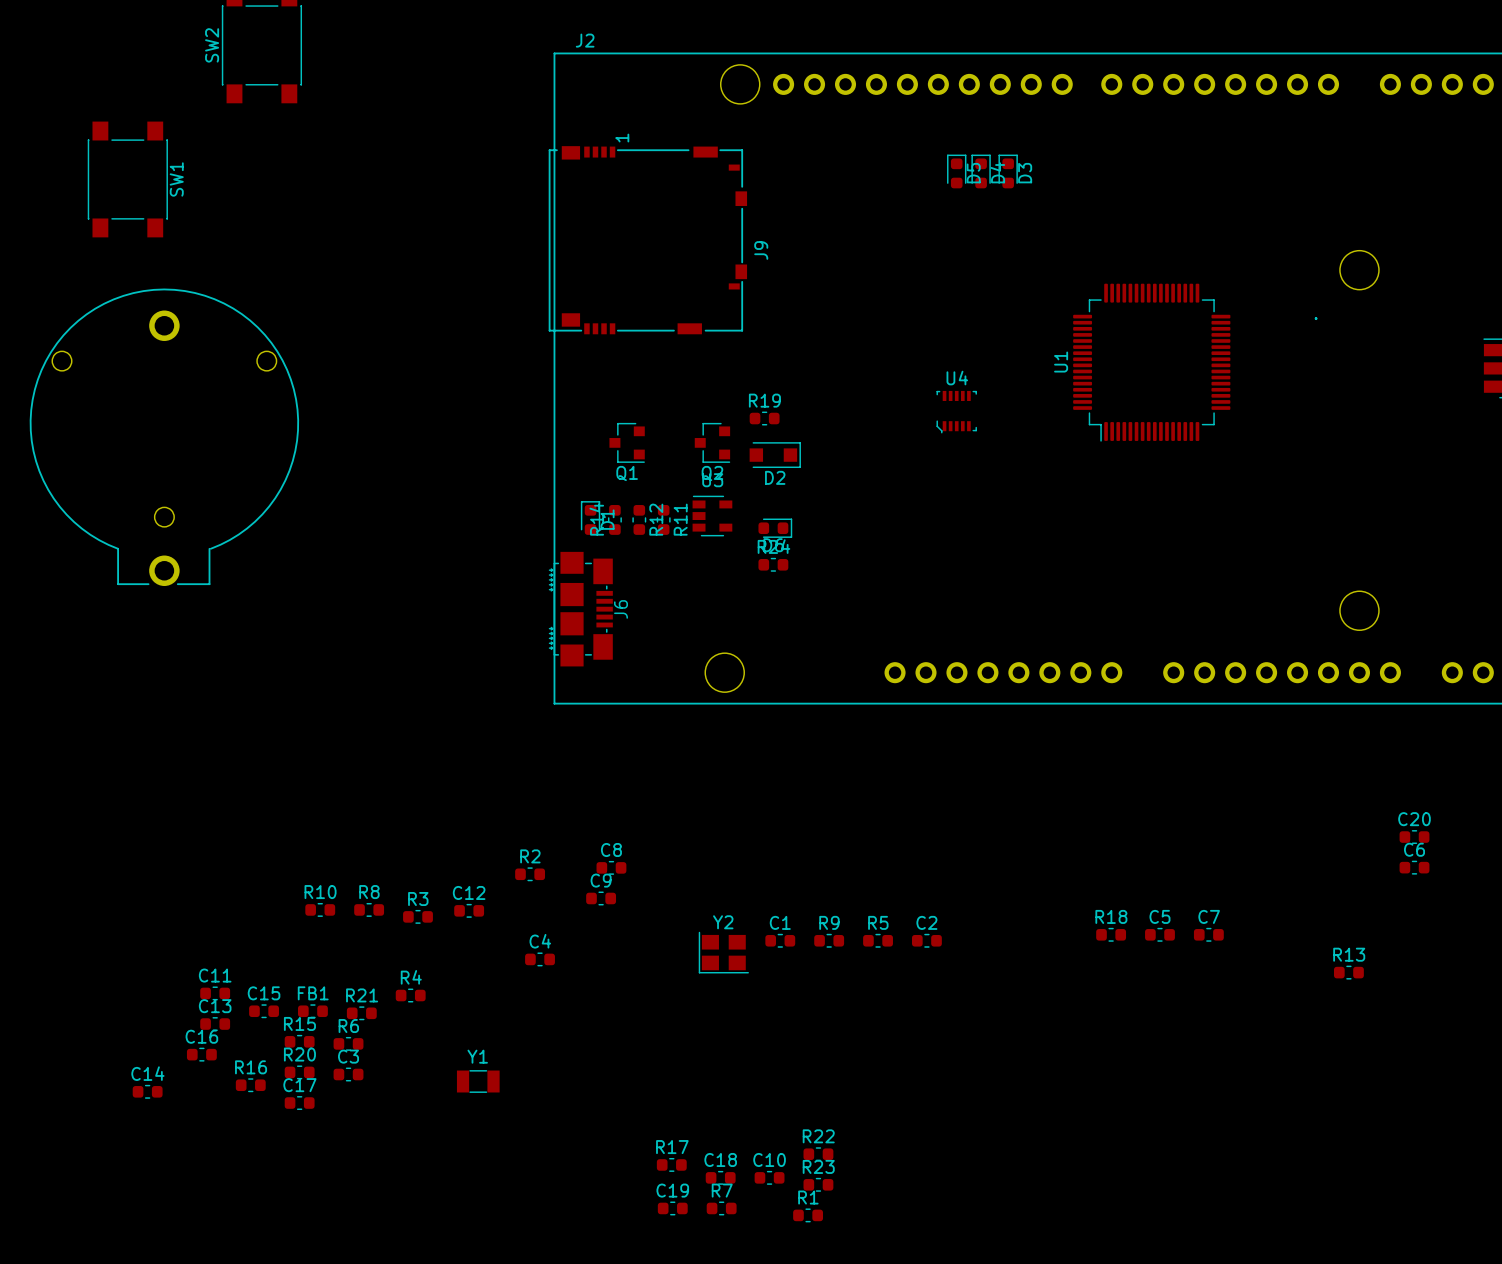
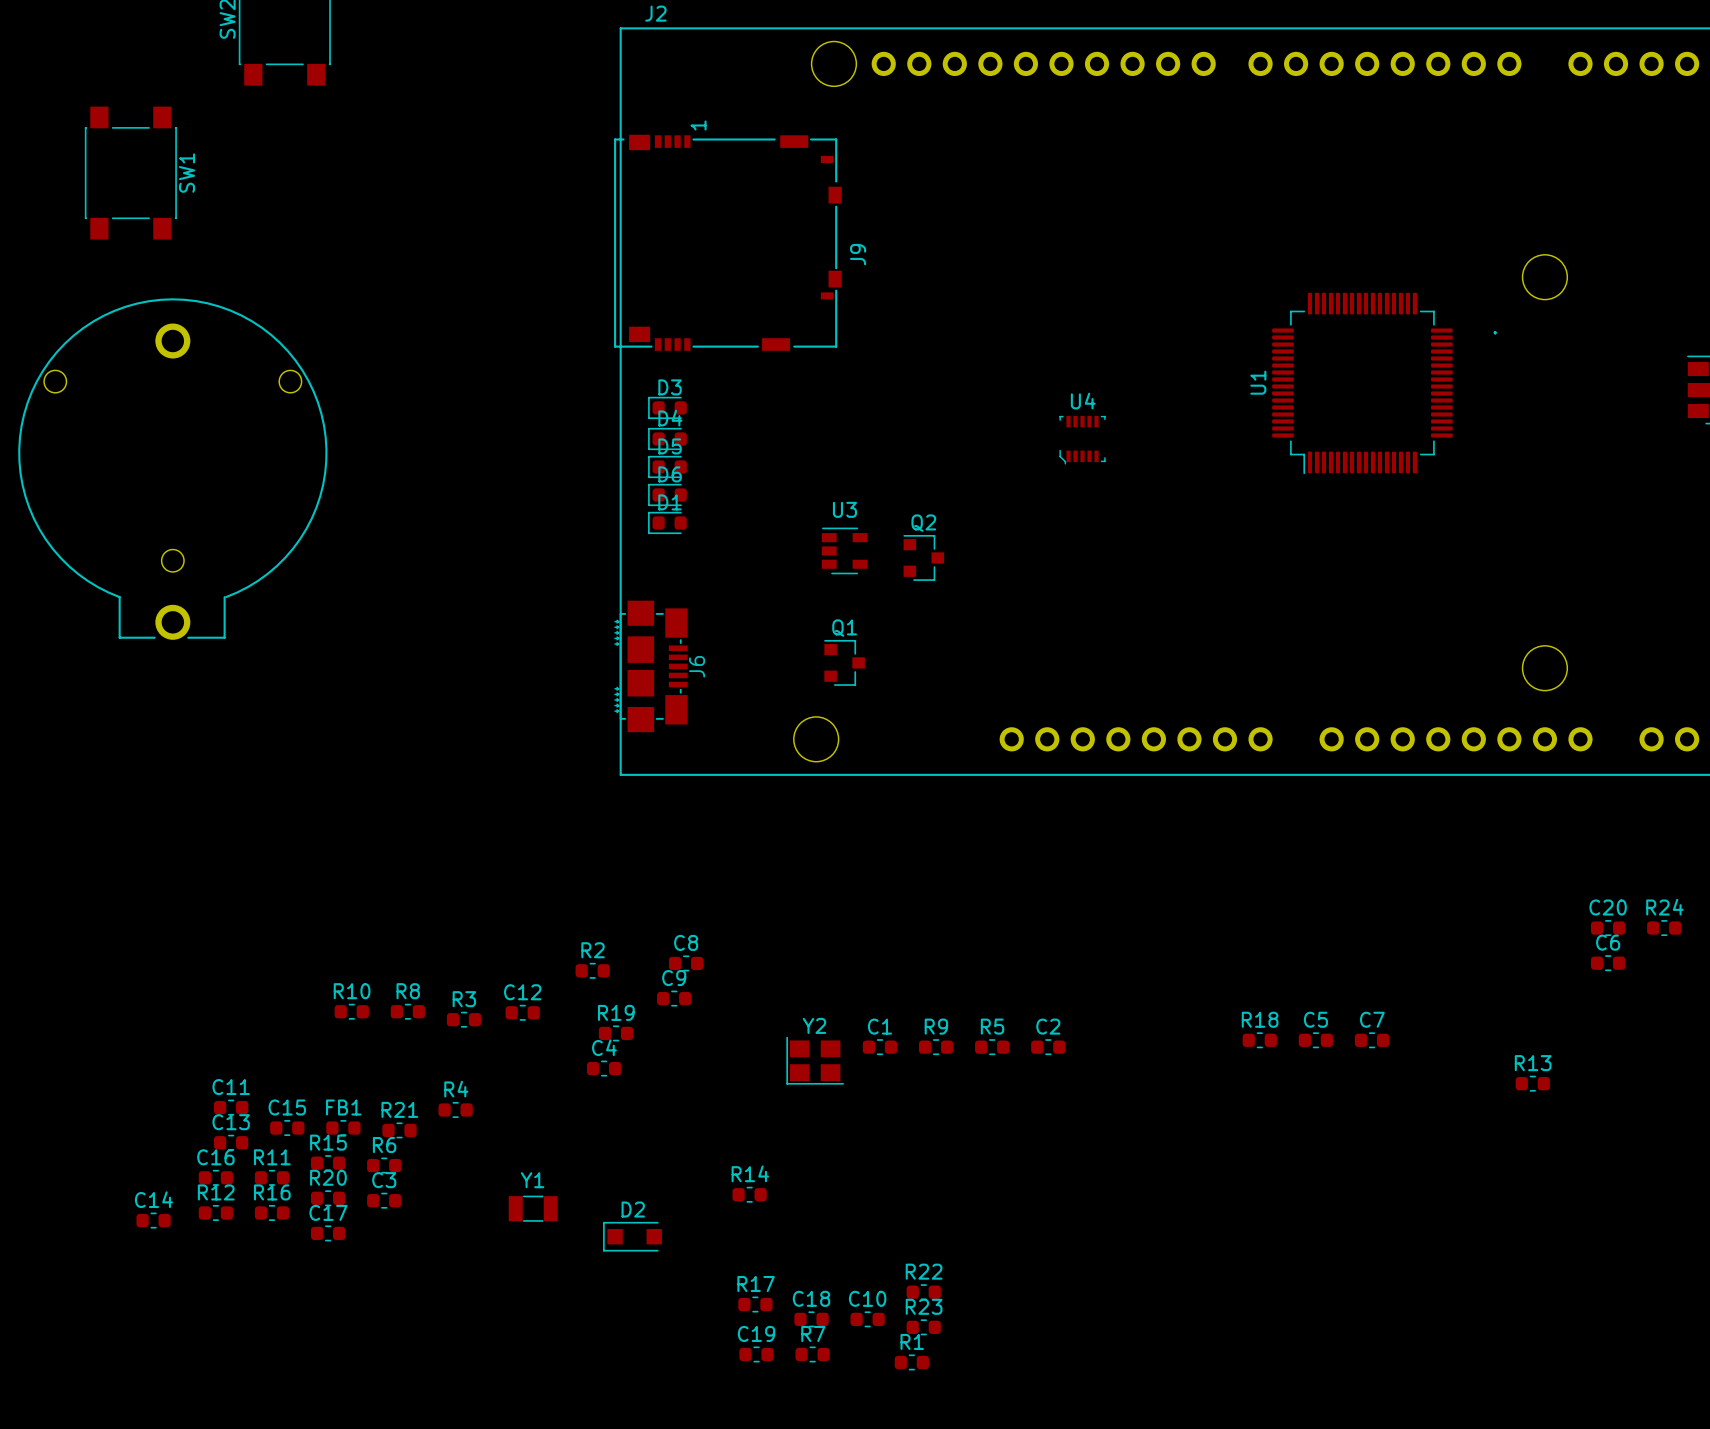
D5 rotation: 0° (956, 171) -> 90° counterclockwise (667, 466)
D5 position: (956, 171) -> (667, 466)
D4 rotation: 0° (981, 171) -> 90° counterclockwise (667, 438)
D4 position: (981, 171) -> (667, 438)
D3 rotation: 0° (1008, 171) -> 90° counterclockwise (667, 407)
D3 position: (1008, 171) -> (667, 407)
U1 position: (1151, 362) -> (1362, 383)
R19 position: (764, 418) -> (616, 1033)
Q1 rotation: 0° (627, 442) -> 180° (844, 662)
Q1 position: (627, 442) -> (844, 662)
Q2 rotation: 0° (712, 442) -> 180° (923, 557)
Q2 position: (712, 442) -> (923, 557)
D2 rotation: 0° (775, 455) -> 180° (632, 1236)
D2 position: (775, 455) -> (632, 1236)
U3 position: (712, 516) -> (844, 550)
D1 rotation: 0° (590, 517) -> 90° counterclockwise (667, 522)
D1 position: (590, 517) -> (667, 522)
R14 rotation: 0° (614, 519) -> 90° clockwise (749, 1194)
R14 position: (614, 519) -> (749, 1194)
R12 rotation: 0° (639, 519) -> 90° clockwise (215, 1212)
R12 position: (639, 519) -> (215, 1212)
R12 name position: R12 (656, 519) -> R12 (216, 1192)
R11 rotation: 0° (663, 519) -> 90° clockwise (272, 1177)
R11 position: (663, 519) -> (272, 1177)
R11 name position: R11 (680, 519) -> R11 (272, 1157)
D6 rotation: 0° (775, 528) -> 180° (667, 494)
D6 position: (775, 528) -> (667, 494)
R24 position: (773, 564) -> (1664, 928)

